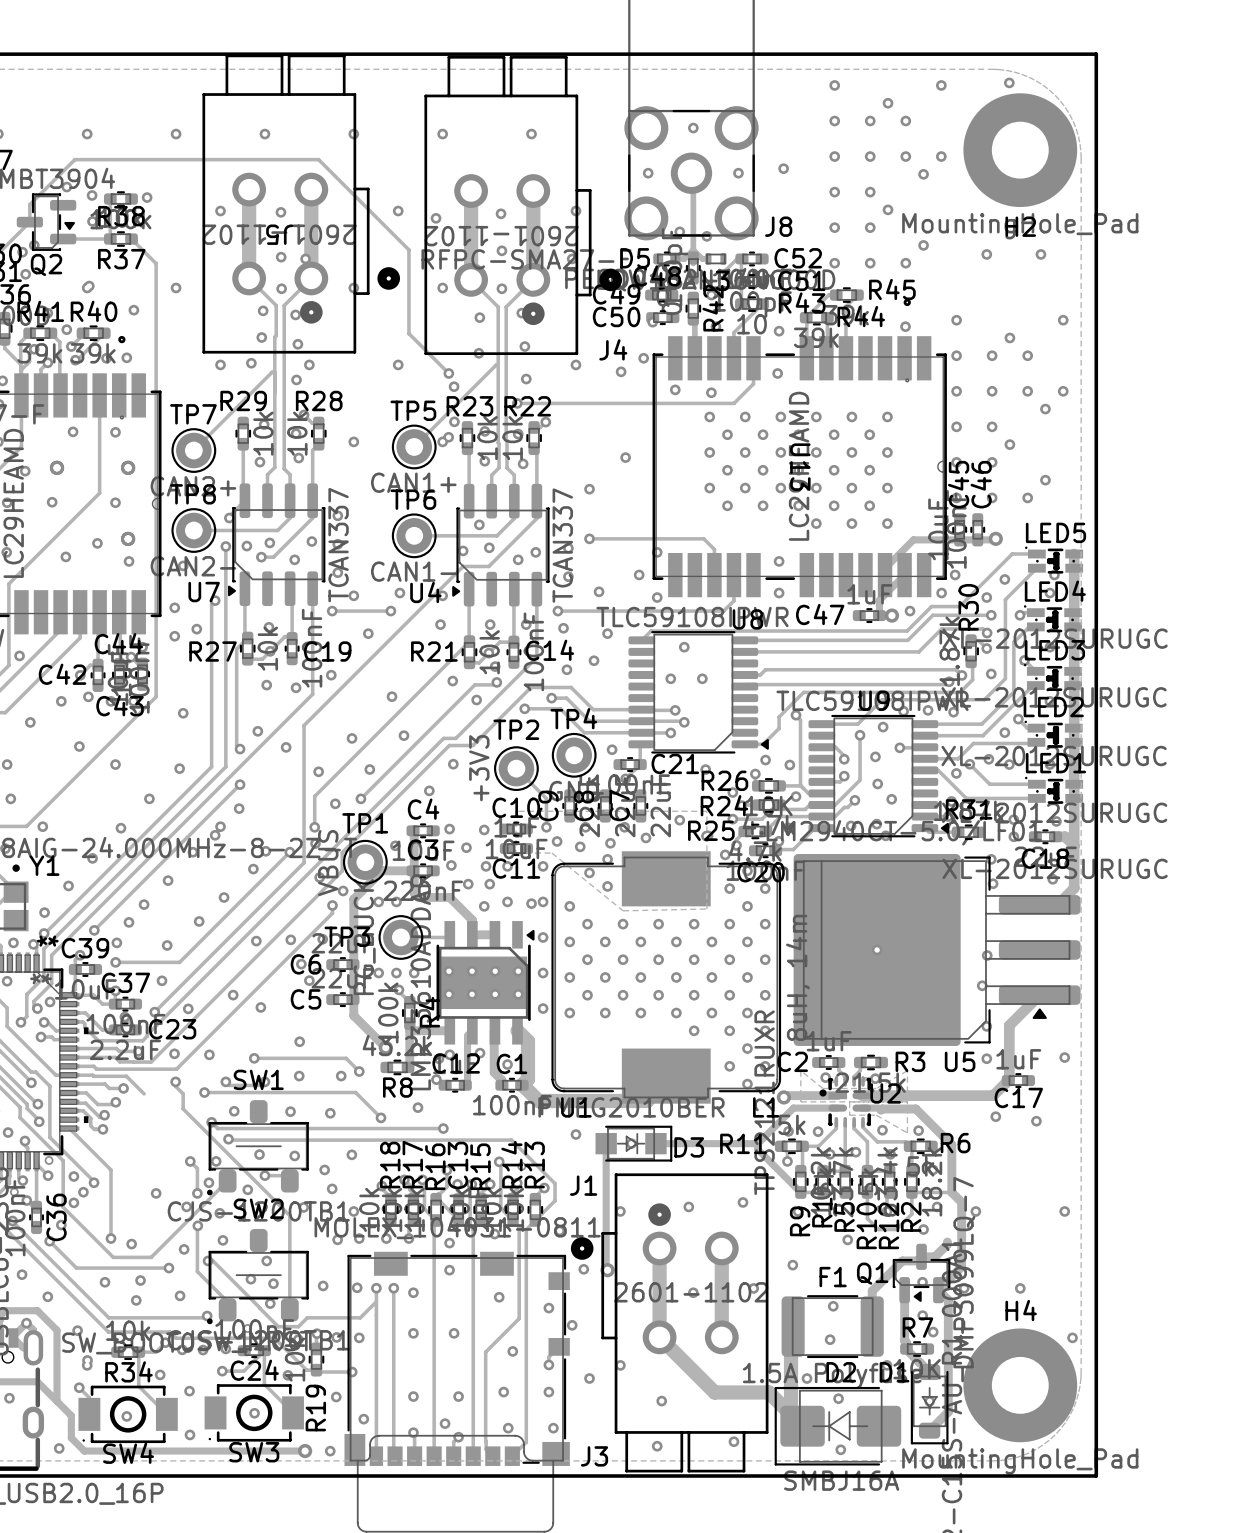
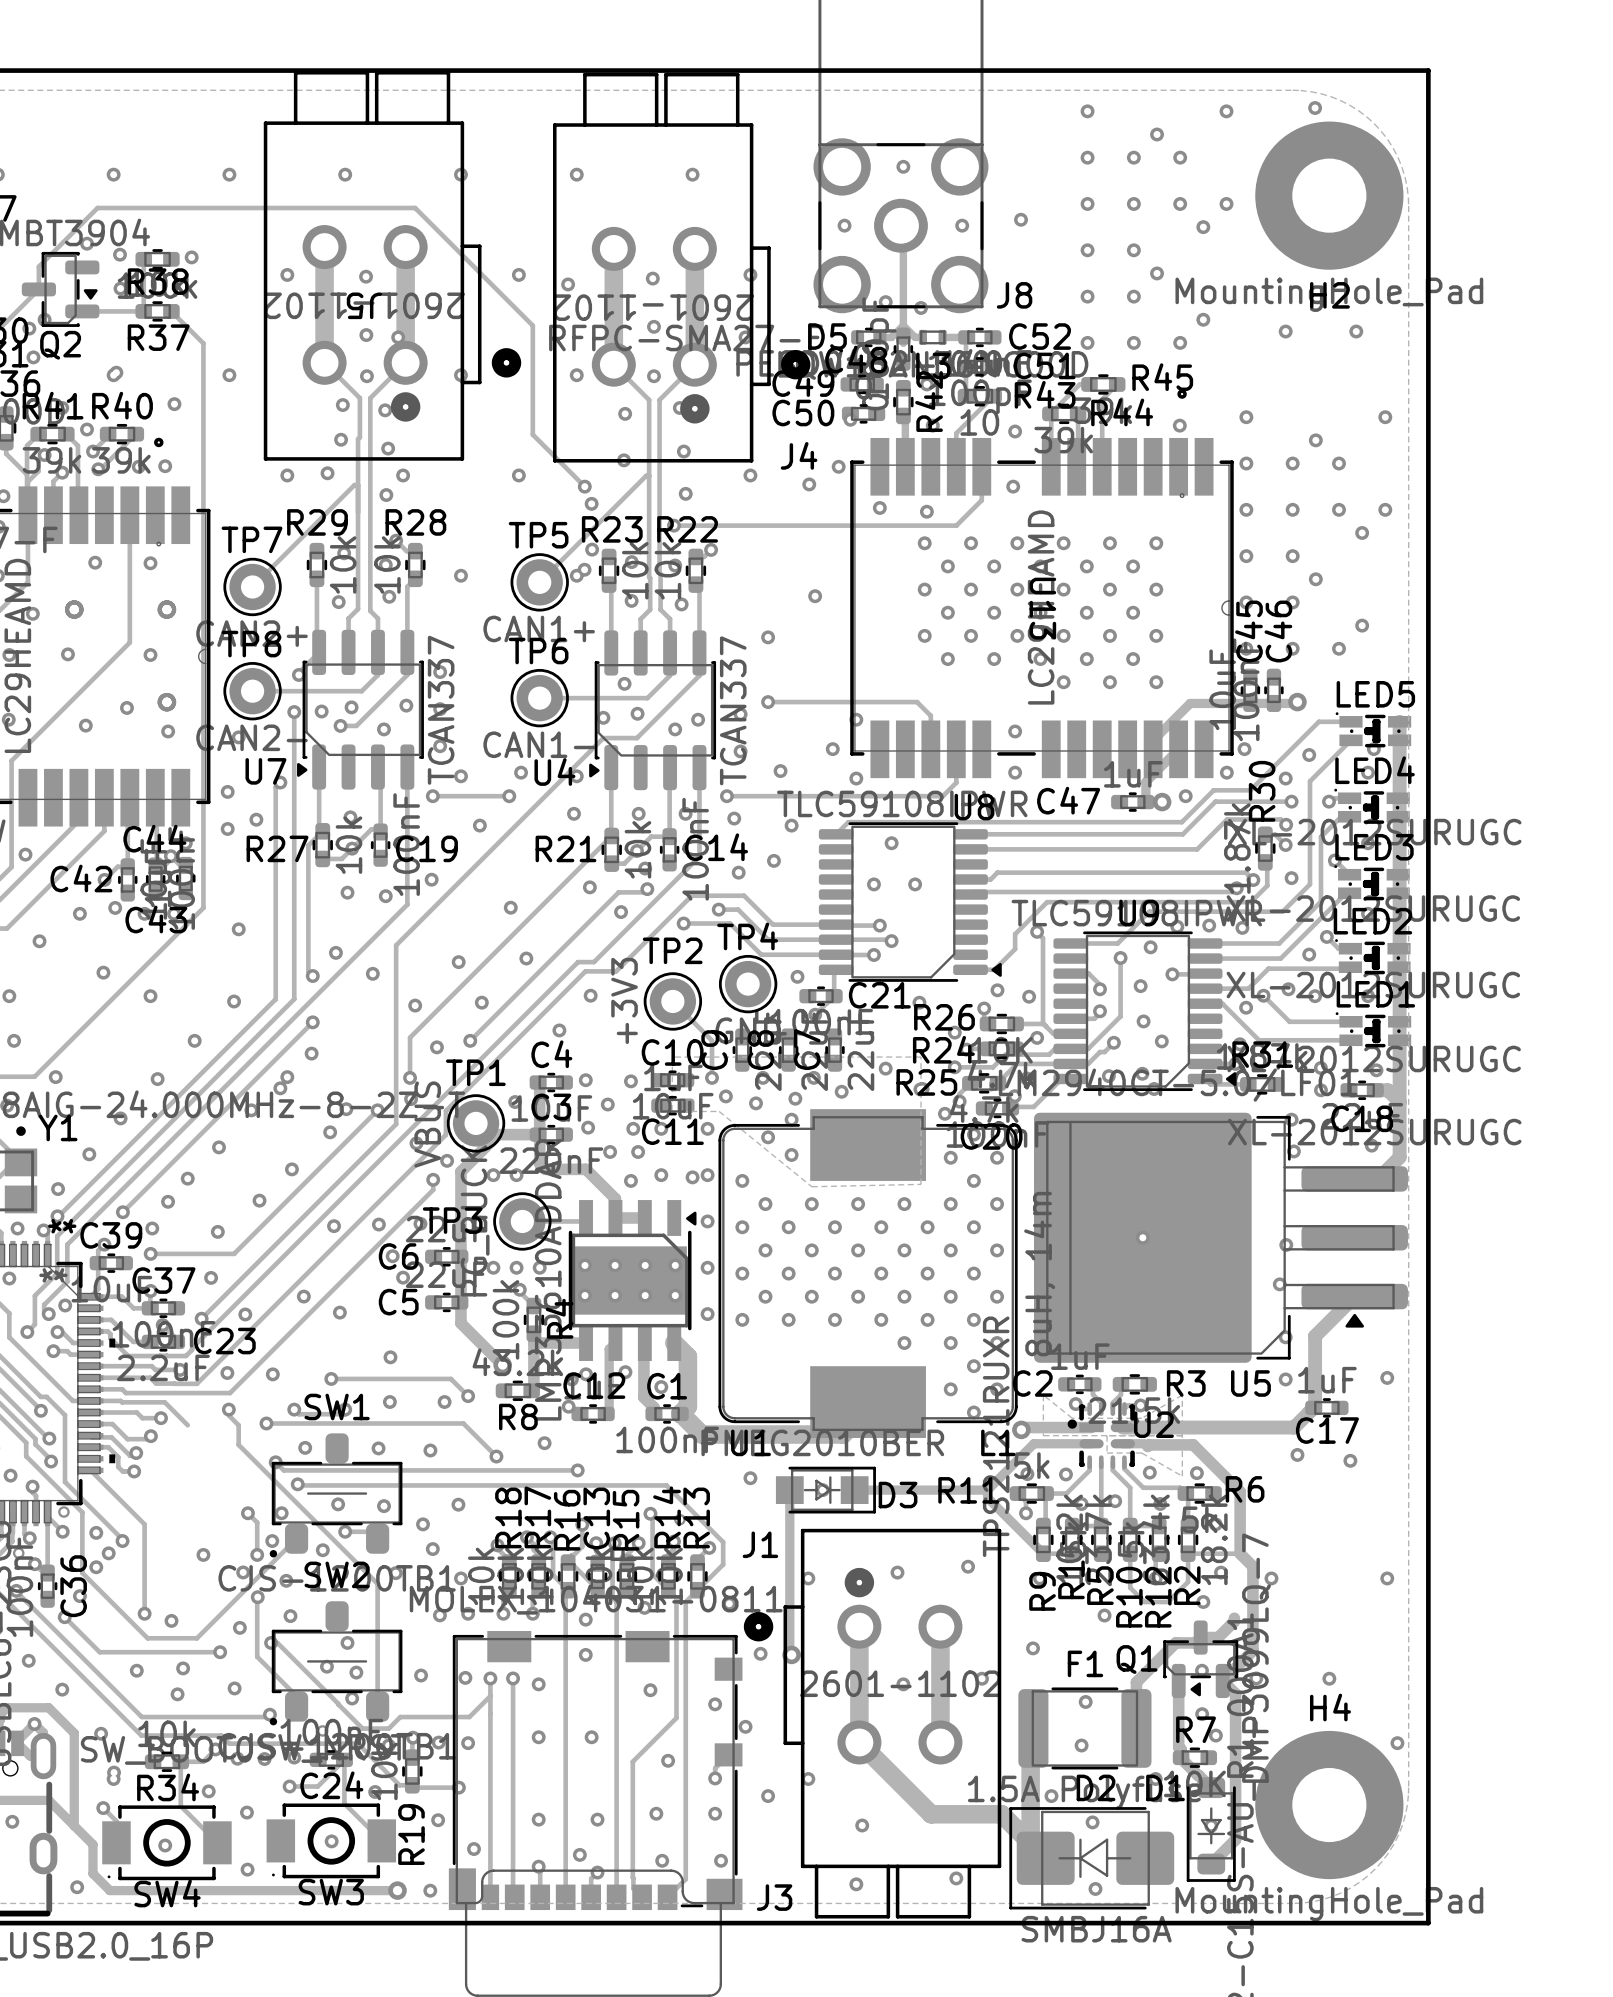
track: (737, 258) (723, 272) -> (960, 337) (942, 337)

